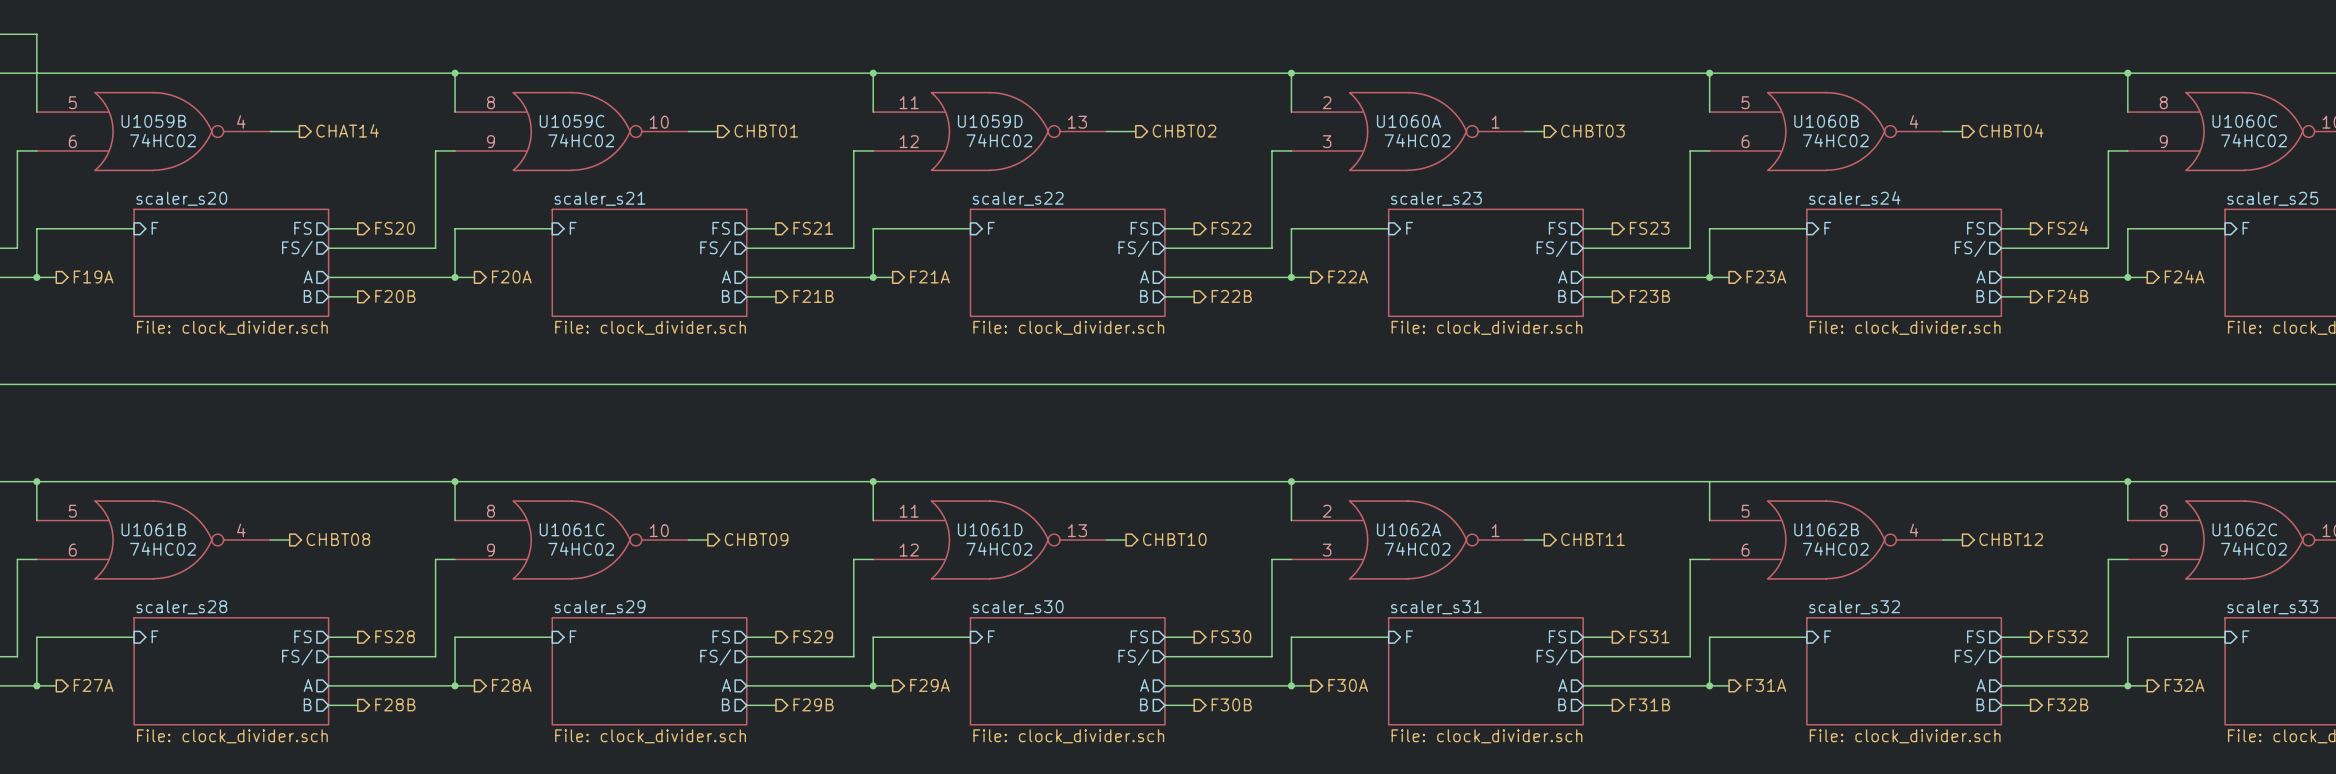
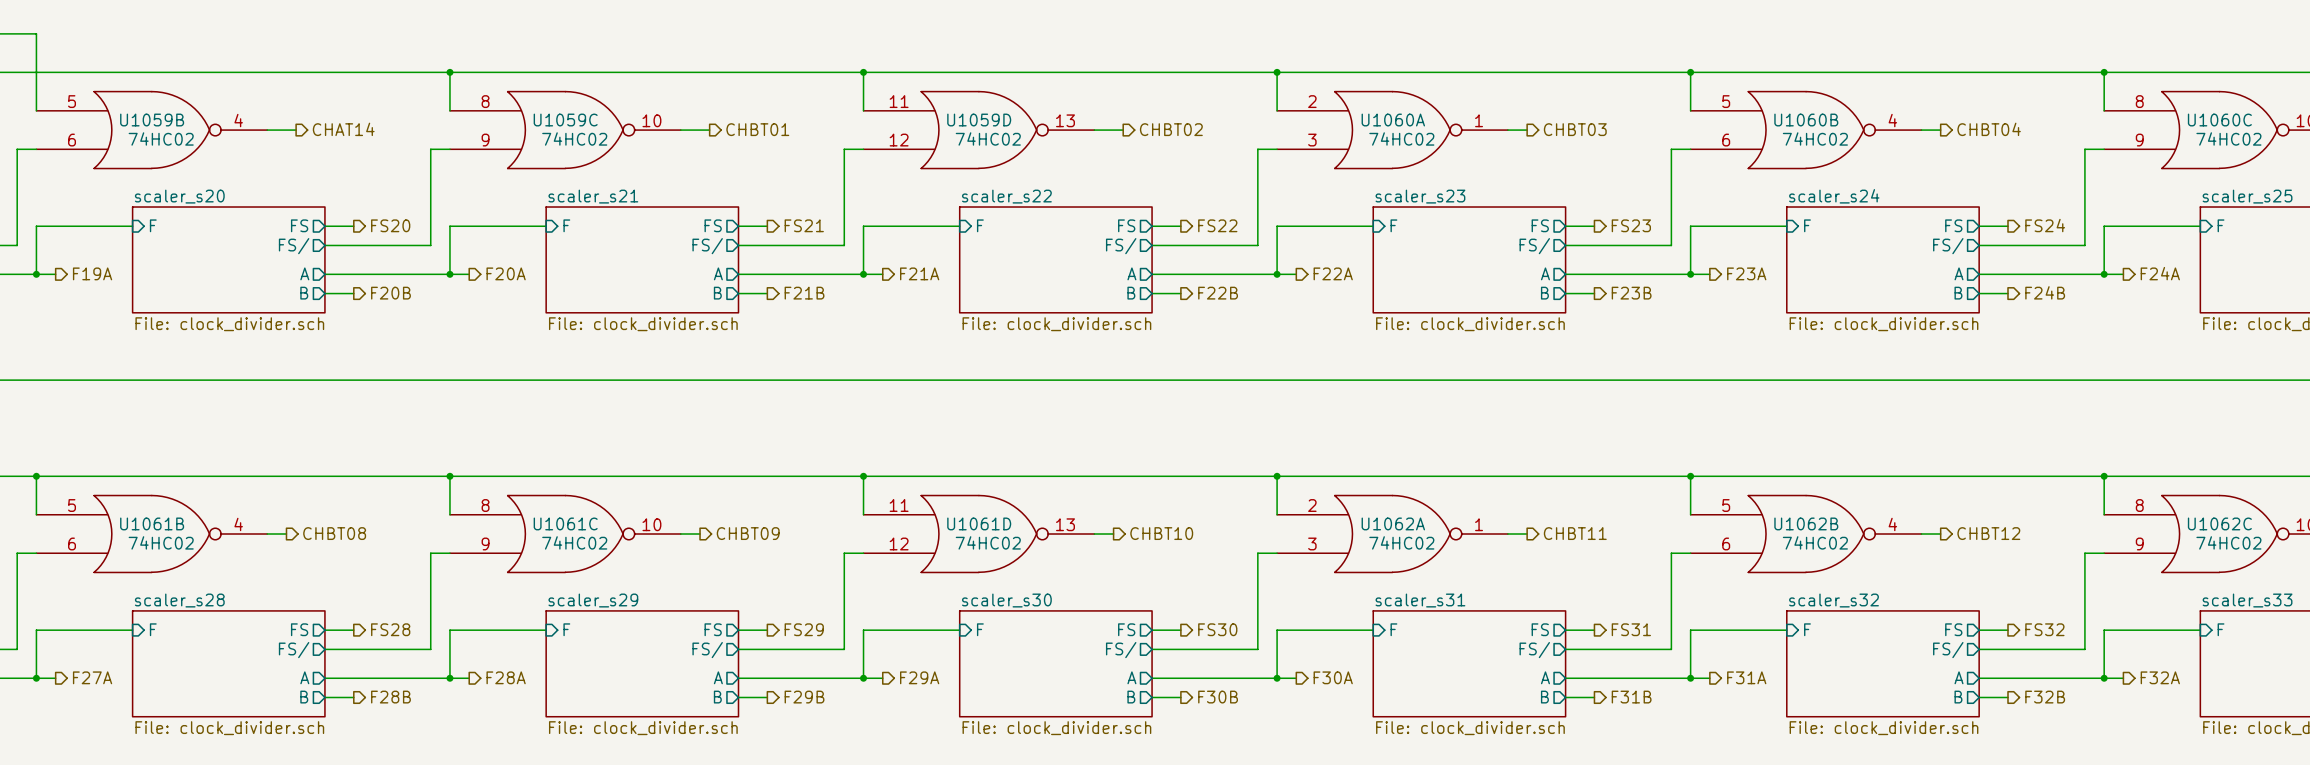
junction: none -> (1690, 476)

